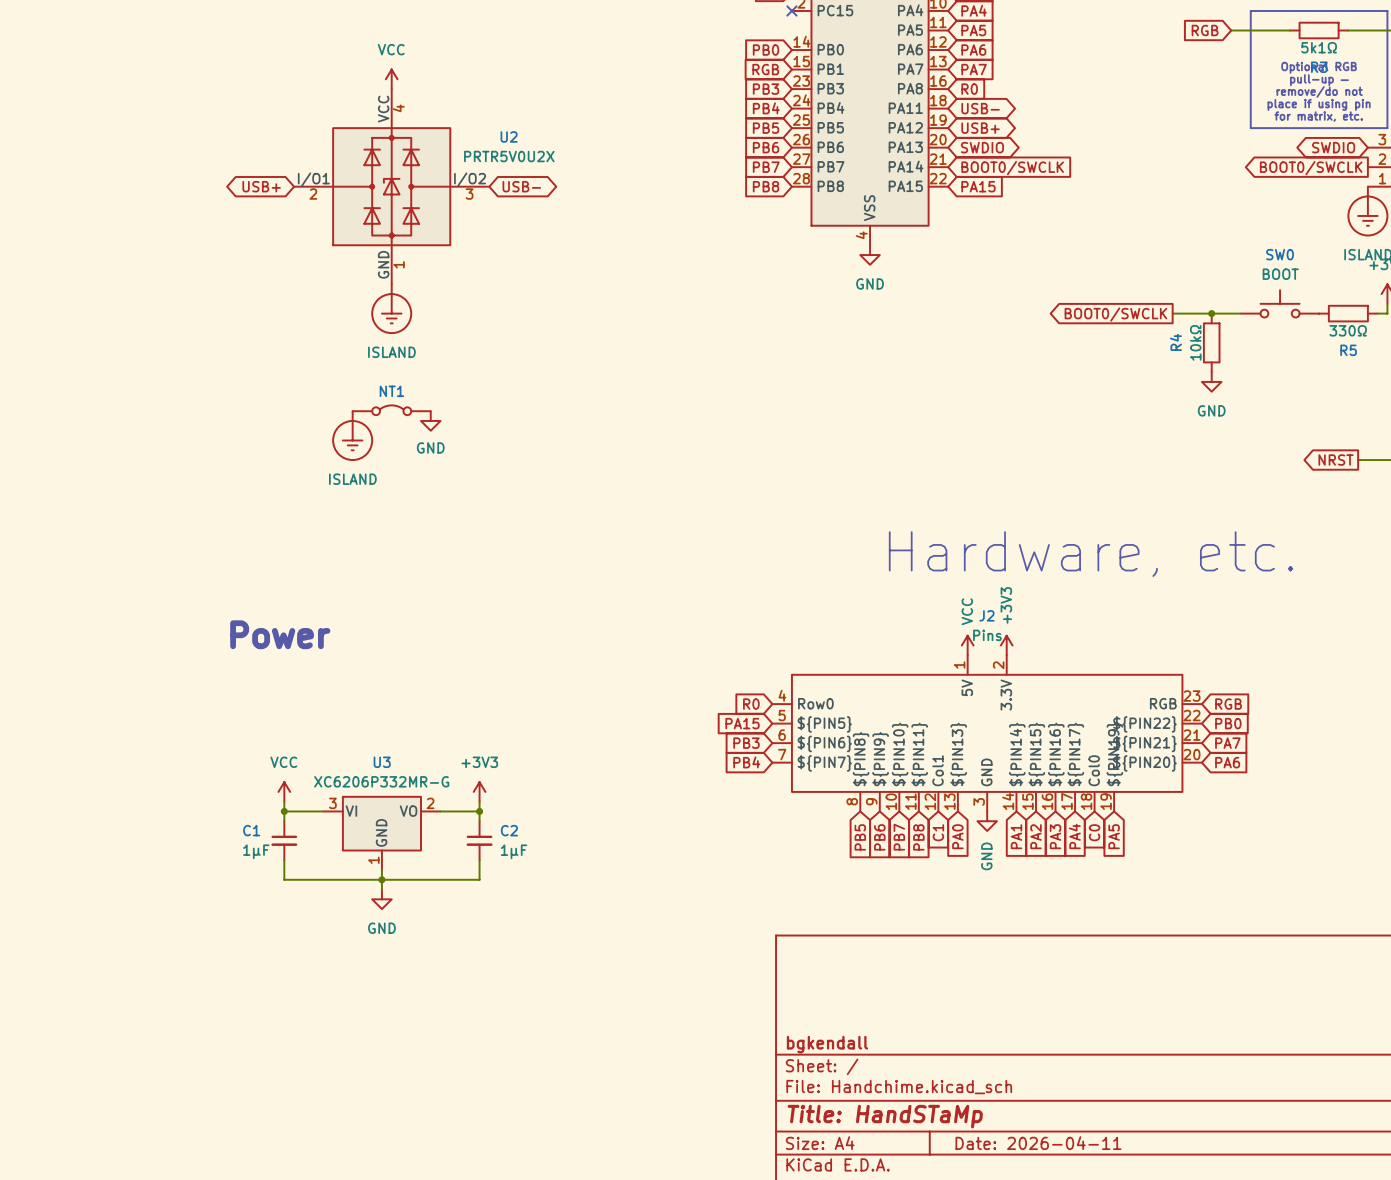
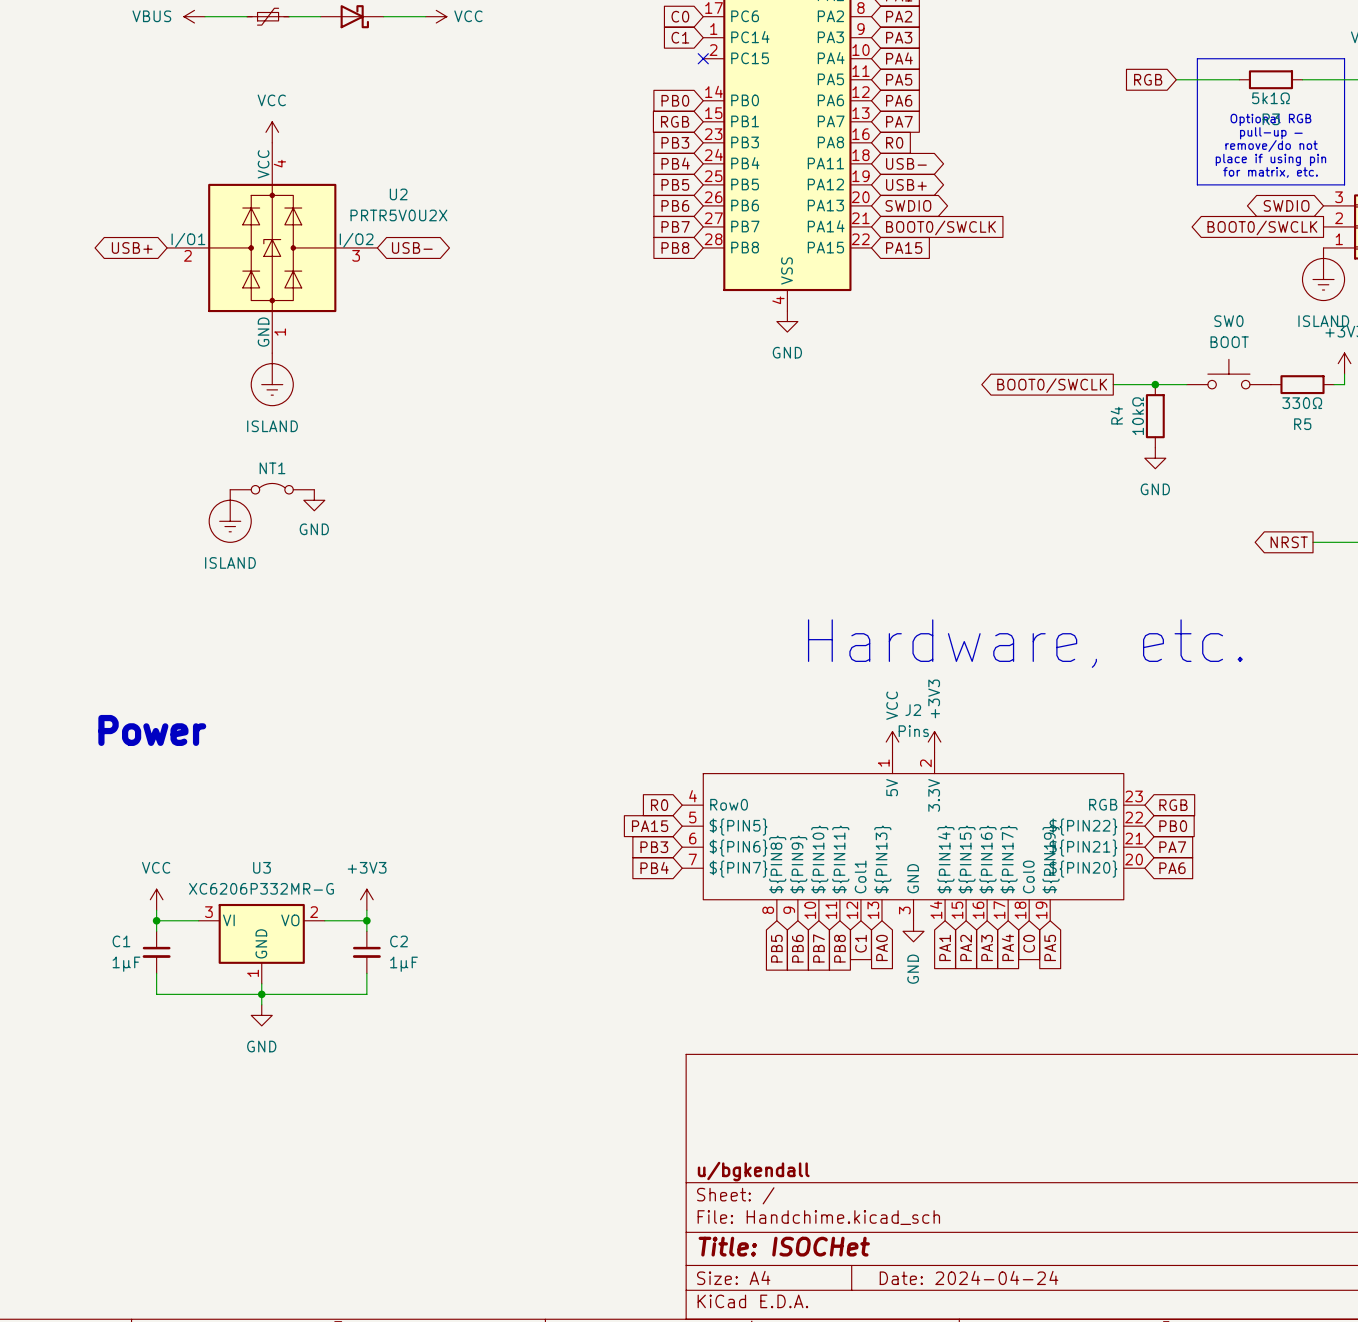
title block: bgkendall (827, 1044) -> u/bgkendall (753, 1171)
title block: Title: HandSTaMp (885, 1116) -> Title: ISOCHet (784, 1246)
title block: Date: 2026-04-11 (1038, 1143) -> Date: 2024-04-24 (969, 1277)

